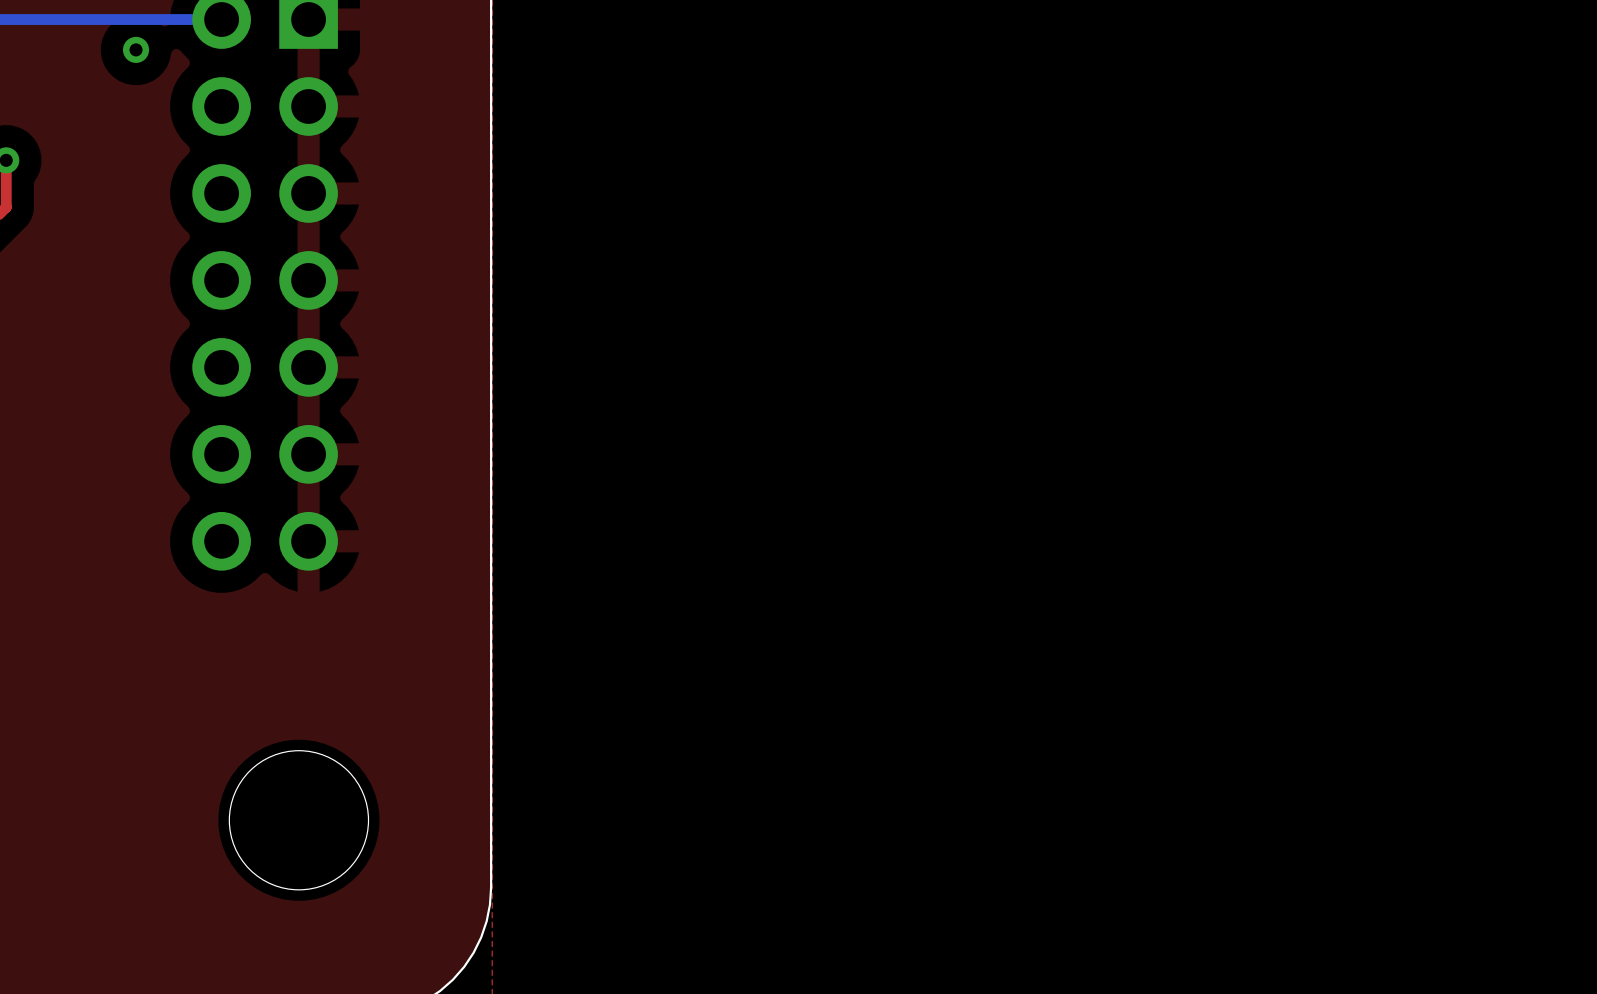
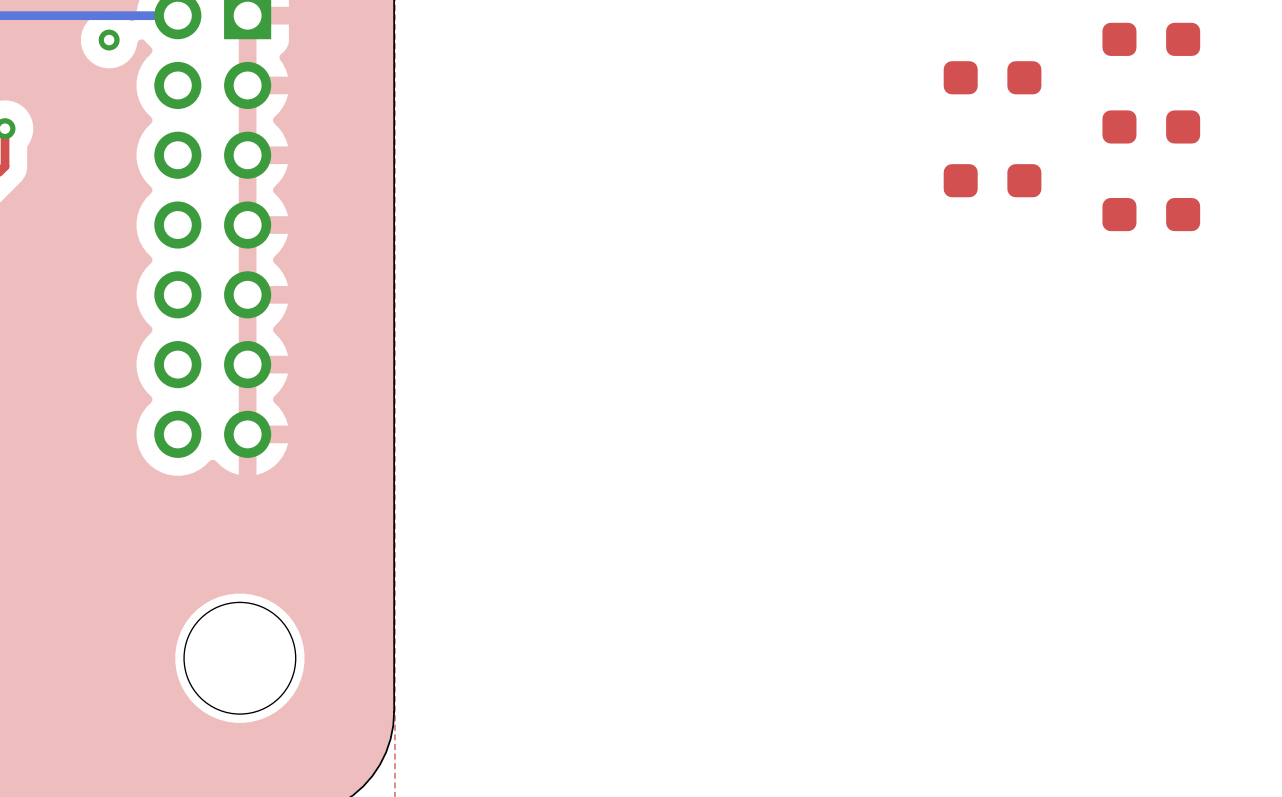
part: none -> (1151, 39)
part: none -> (992, 77)
part: none -> (1151, 126)
part: none -> (992, 180)
part: none -> (1151, 214)

